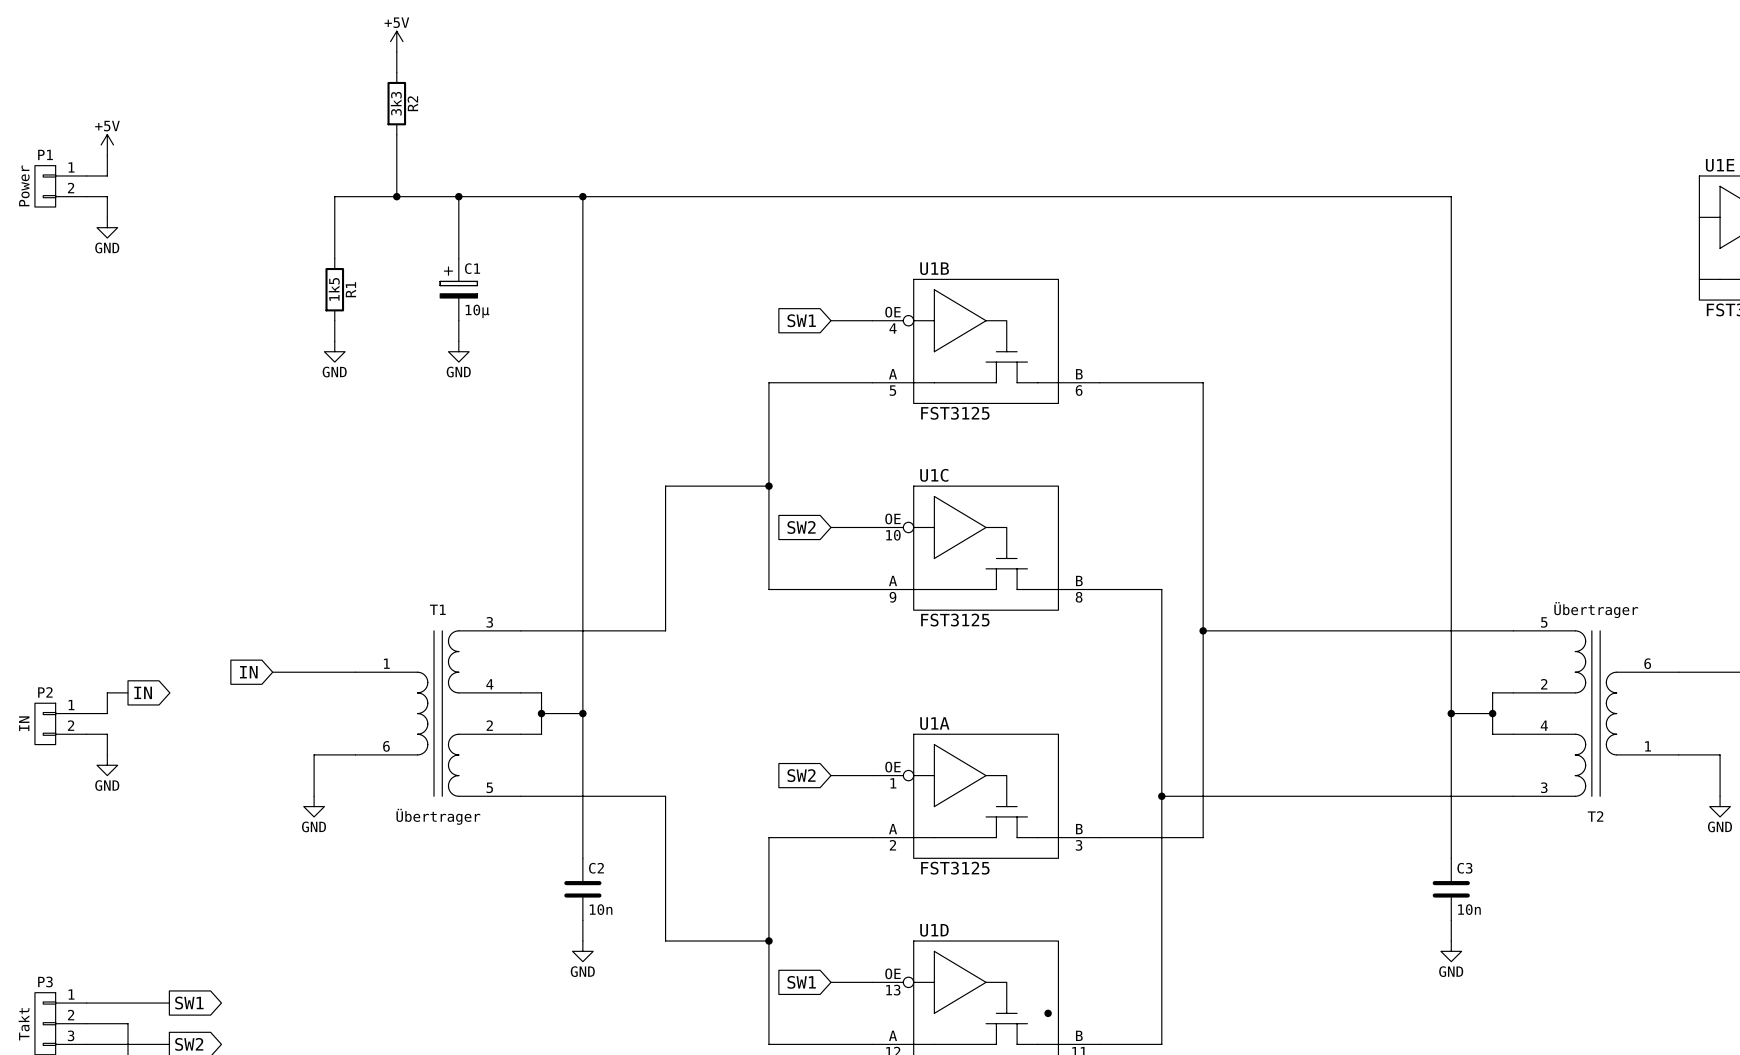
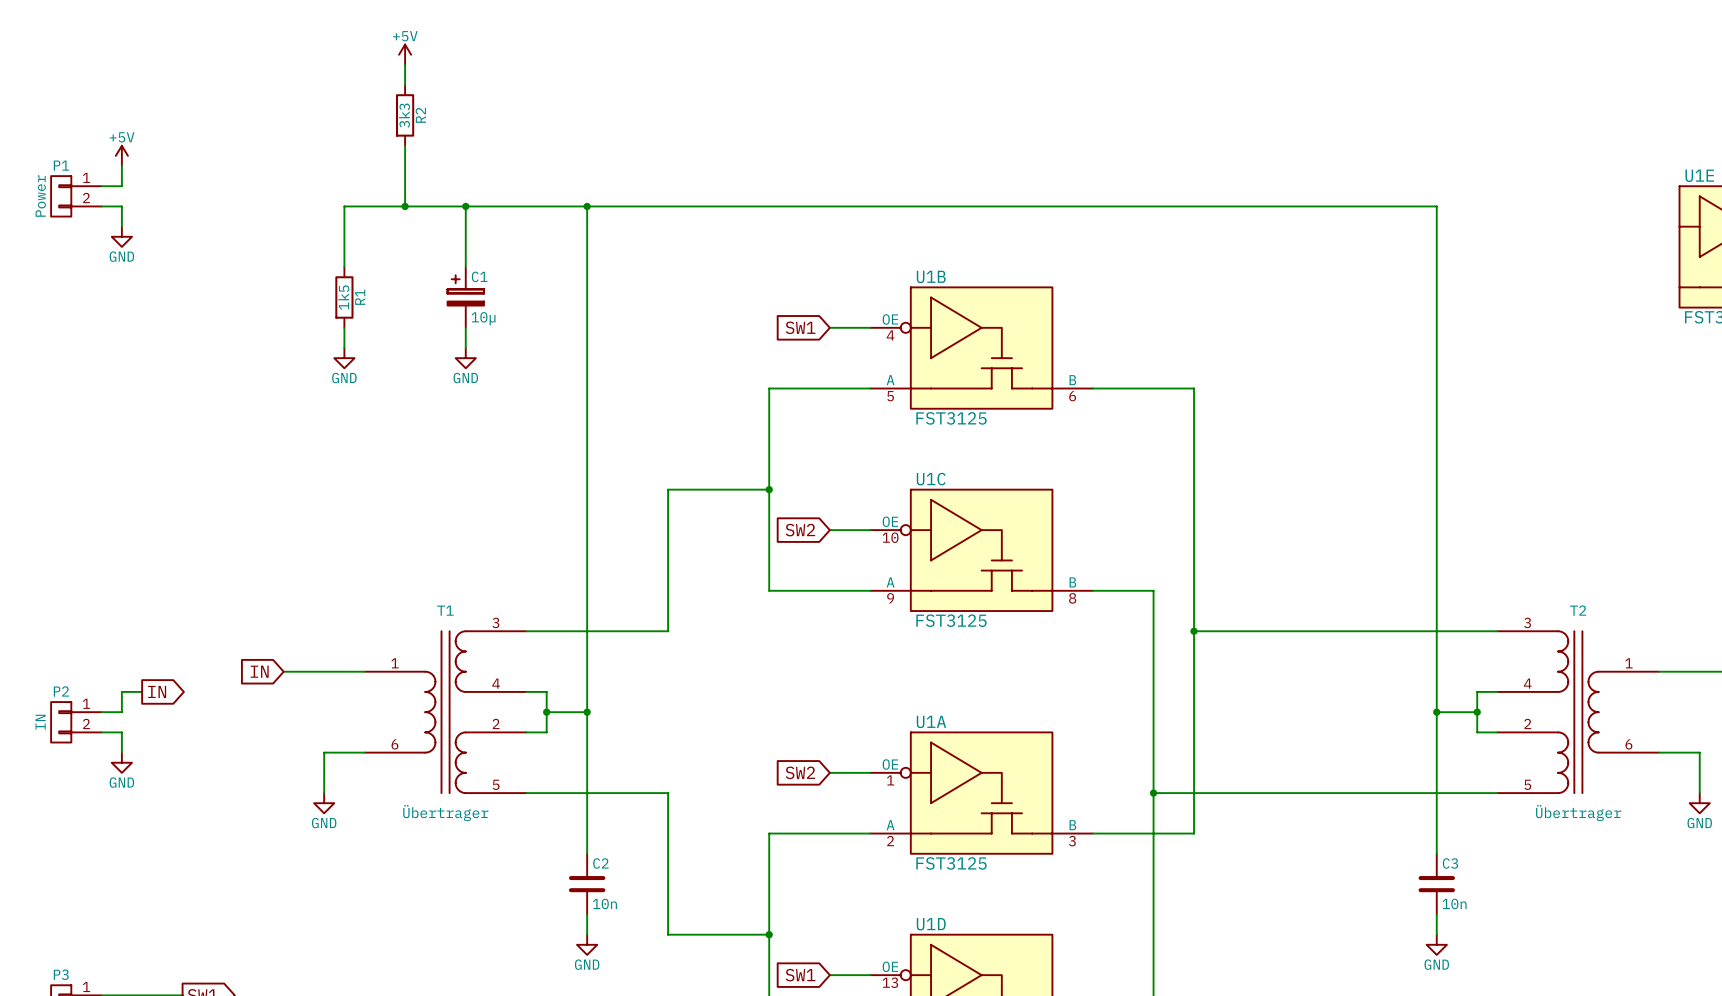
T2 flip: as is (1595, 713) -> up-down (1578, 712)

